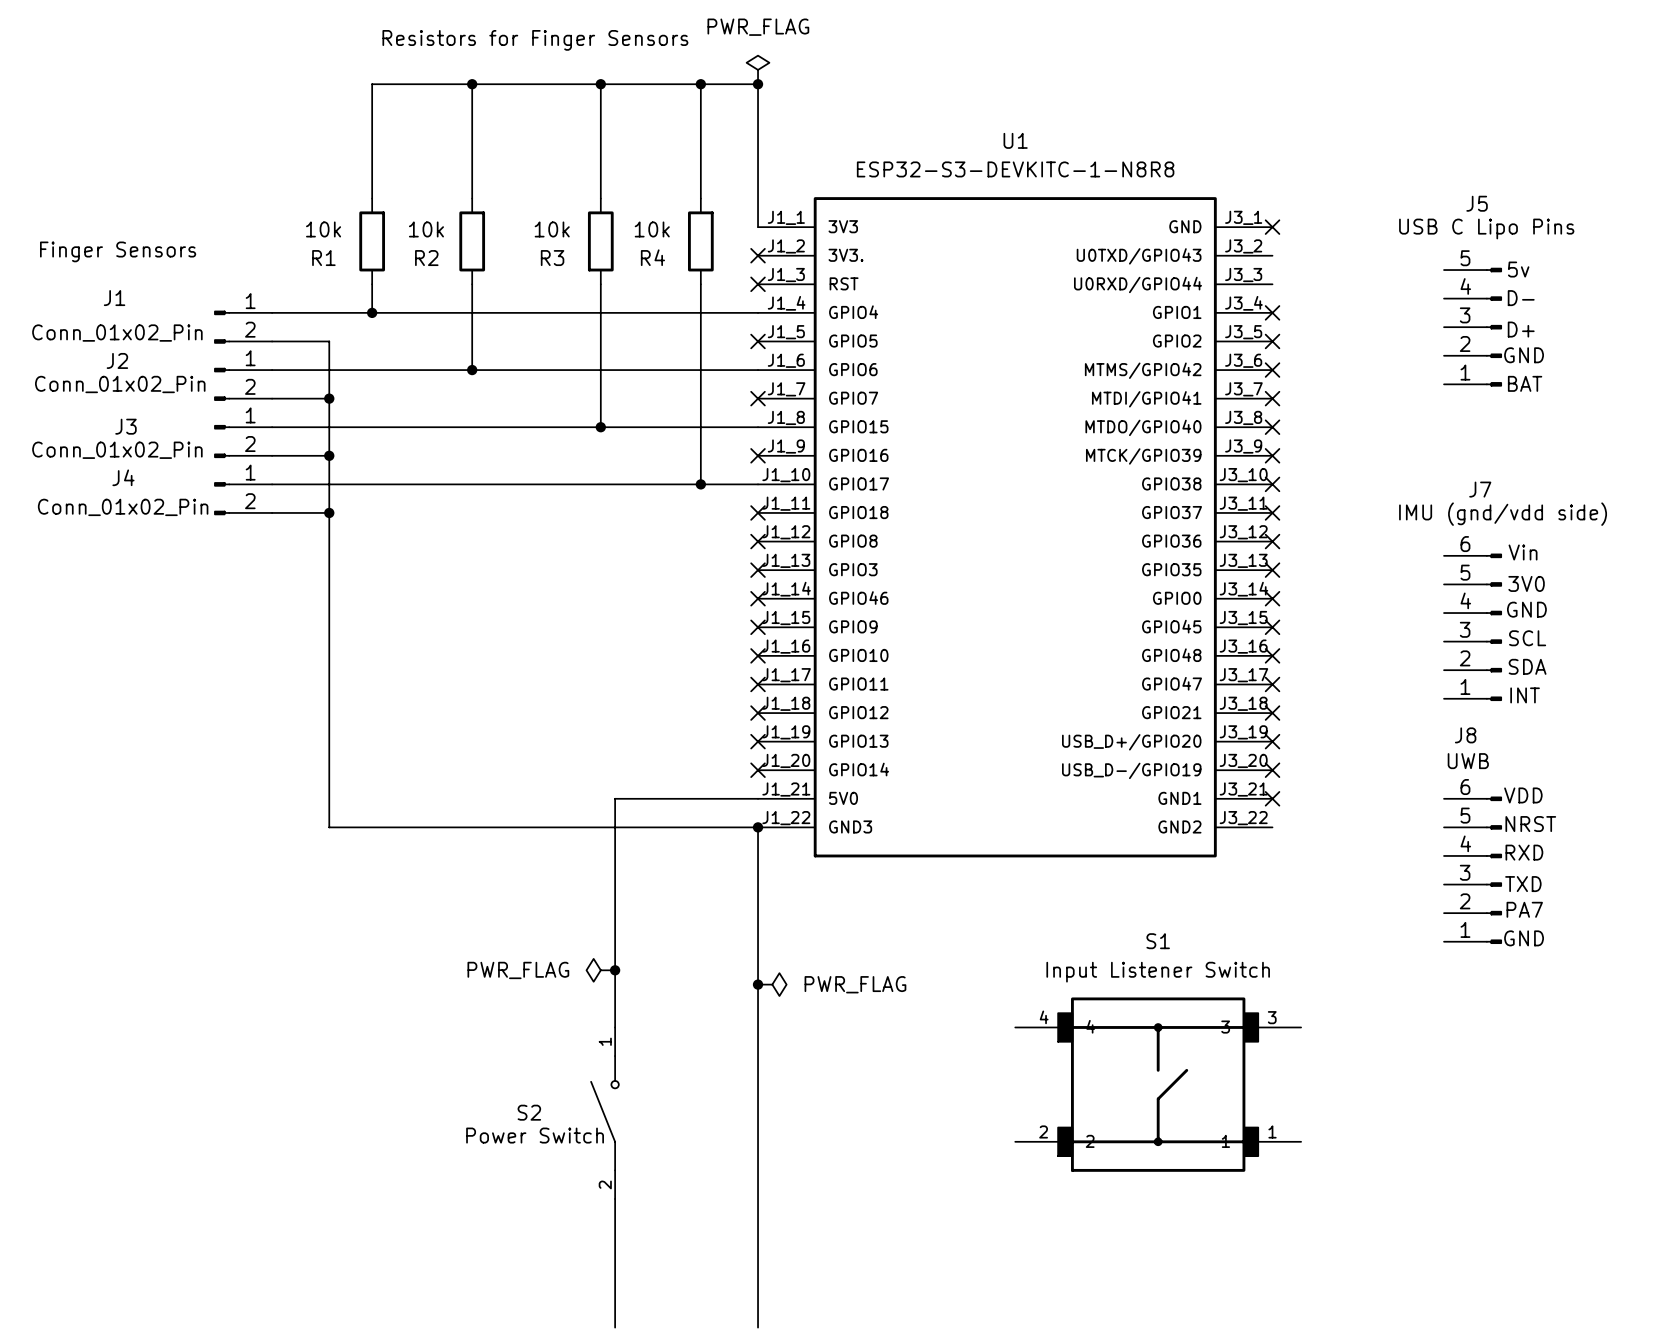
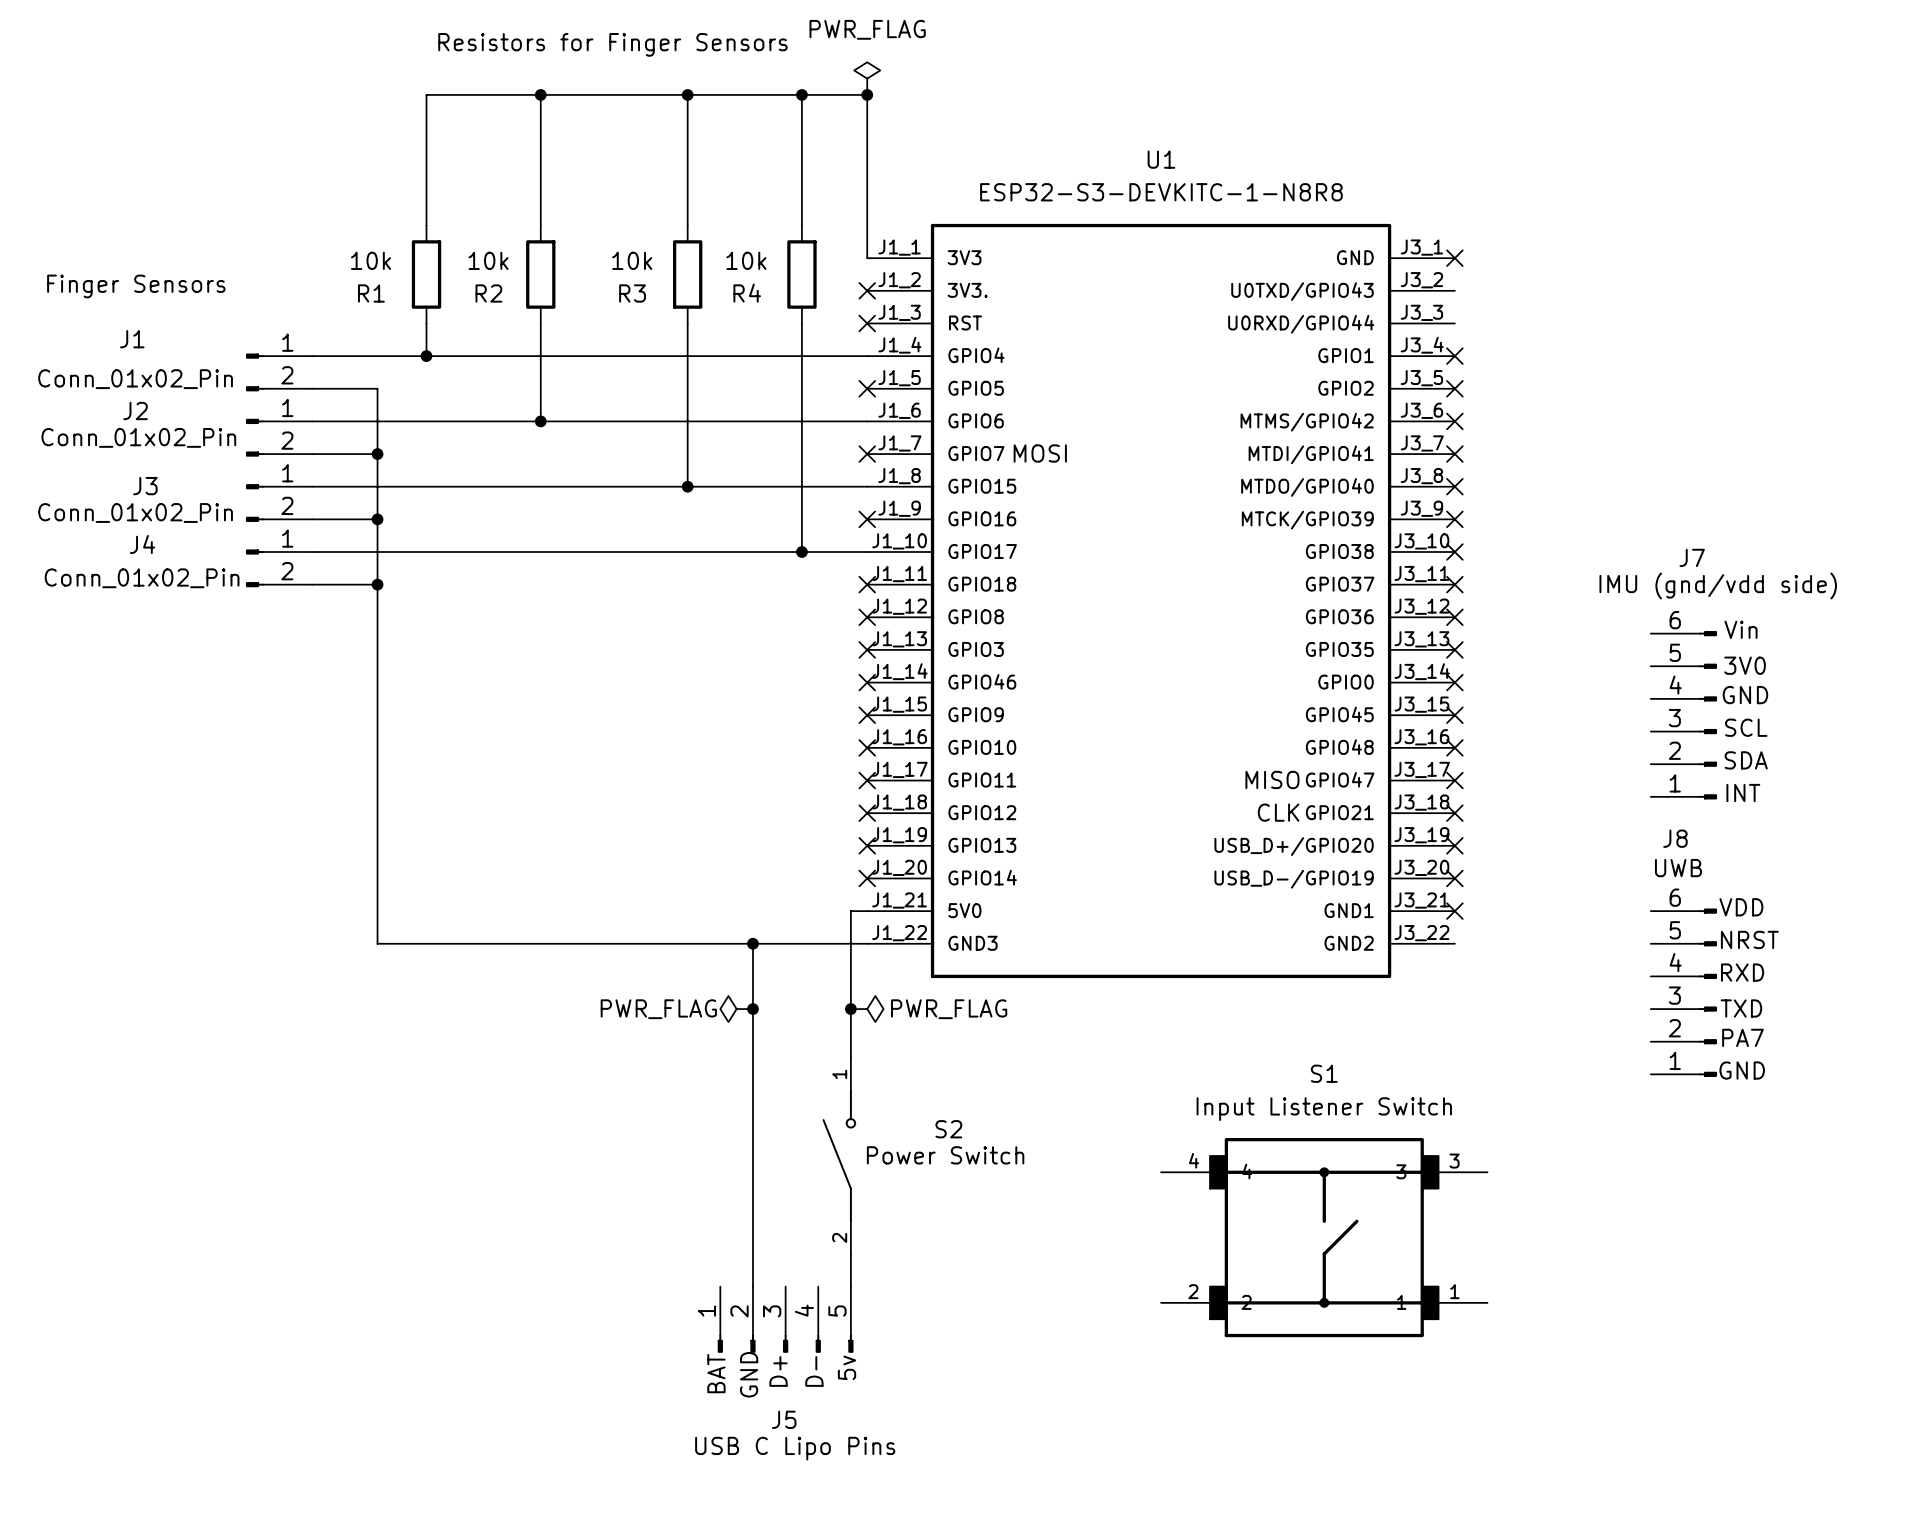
J5 name position: J5 (1477, 203) -> J5 (784, 1419)
J5 value position: USB C Lipo Pins (1486, 228) -> USB C Lipo Pins (795, 1448)
text: 5v (1518, 269) -> none
text: D- (1521, 298) -> none
J5 position: (1473, 327) -> (785, 1319)
J5 rotation: 0° (1494, 327) -> 90° clockwise (785, 1343)
text: D+ (1521, 329) -> none
text: GND (1524, 355) -> none
text: BAT (1525, 383) -> none
text: none -> MOSI (1040, 453)
text: none -> MISO (1272, 779)
text: none -> CLK (1278, 812)
wire: (743, 798) (615, 798) (615, 1027) -> (850, 911) (850, 1058)
wire: none -> (752, 943) (752, 1286)
junction: none -> (752, 943)
wire: (758, 827) (758, 1327) -> none
junction: (758, 827) -> none
power symbol: none -> PWR_FLAG (736, 1009)
junction: none -> (752, 1009)
junction: none -> (850, 1009)
power symbol: none -> PWR_FLAG (867, 1009)
power symbol: PWR_FLAG (600, 970) -> none
junction: (615, 970) -> none
junction: (758, 984) -> none
power symbol: PWR_FLAG (772, 984) -> none
wire: none -> (850, 1253) (850, 1286)
S2 name position: S2 (529, 1112) -> S2 (948, 1129)
S2 position: (604, 1113) -> (839, 1155)
S2 value position: Power Switch (535, 1135) -> Power Switch (945, 1155)
wire: (615, 1198) (615, 1327) -> none
text: none -> 5v (847, 1367)
text: none -> D+ (778, 1371)
text: none -> D- (814, 1371)
text: none -> BAT (716, 1373)
text: none -> GND (749, 1374)

